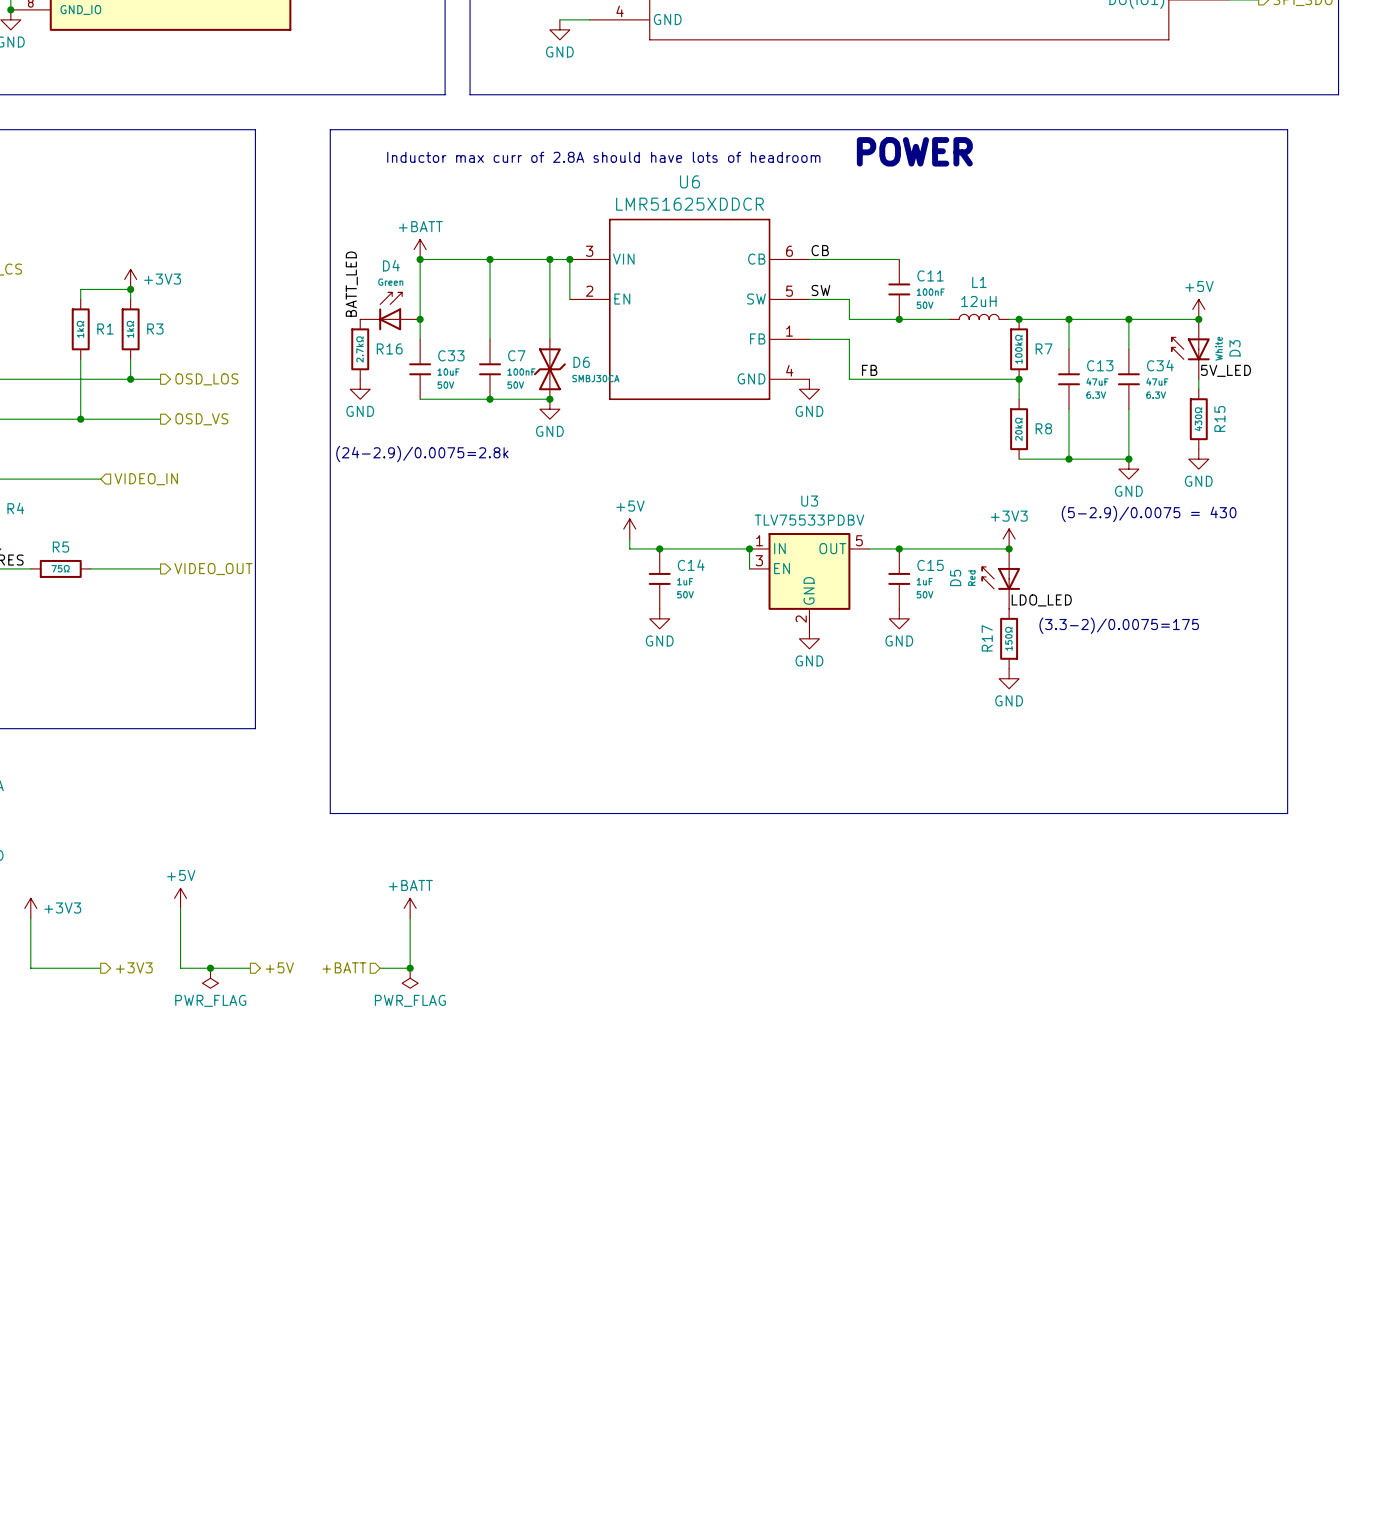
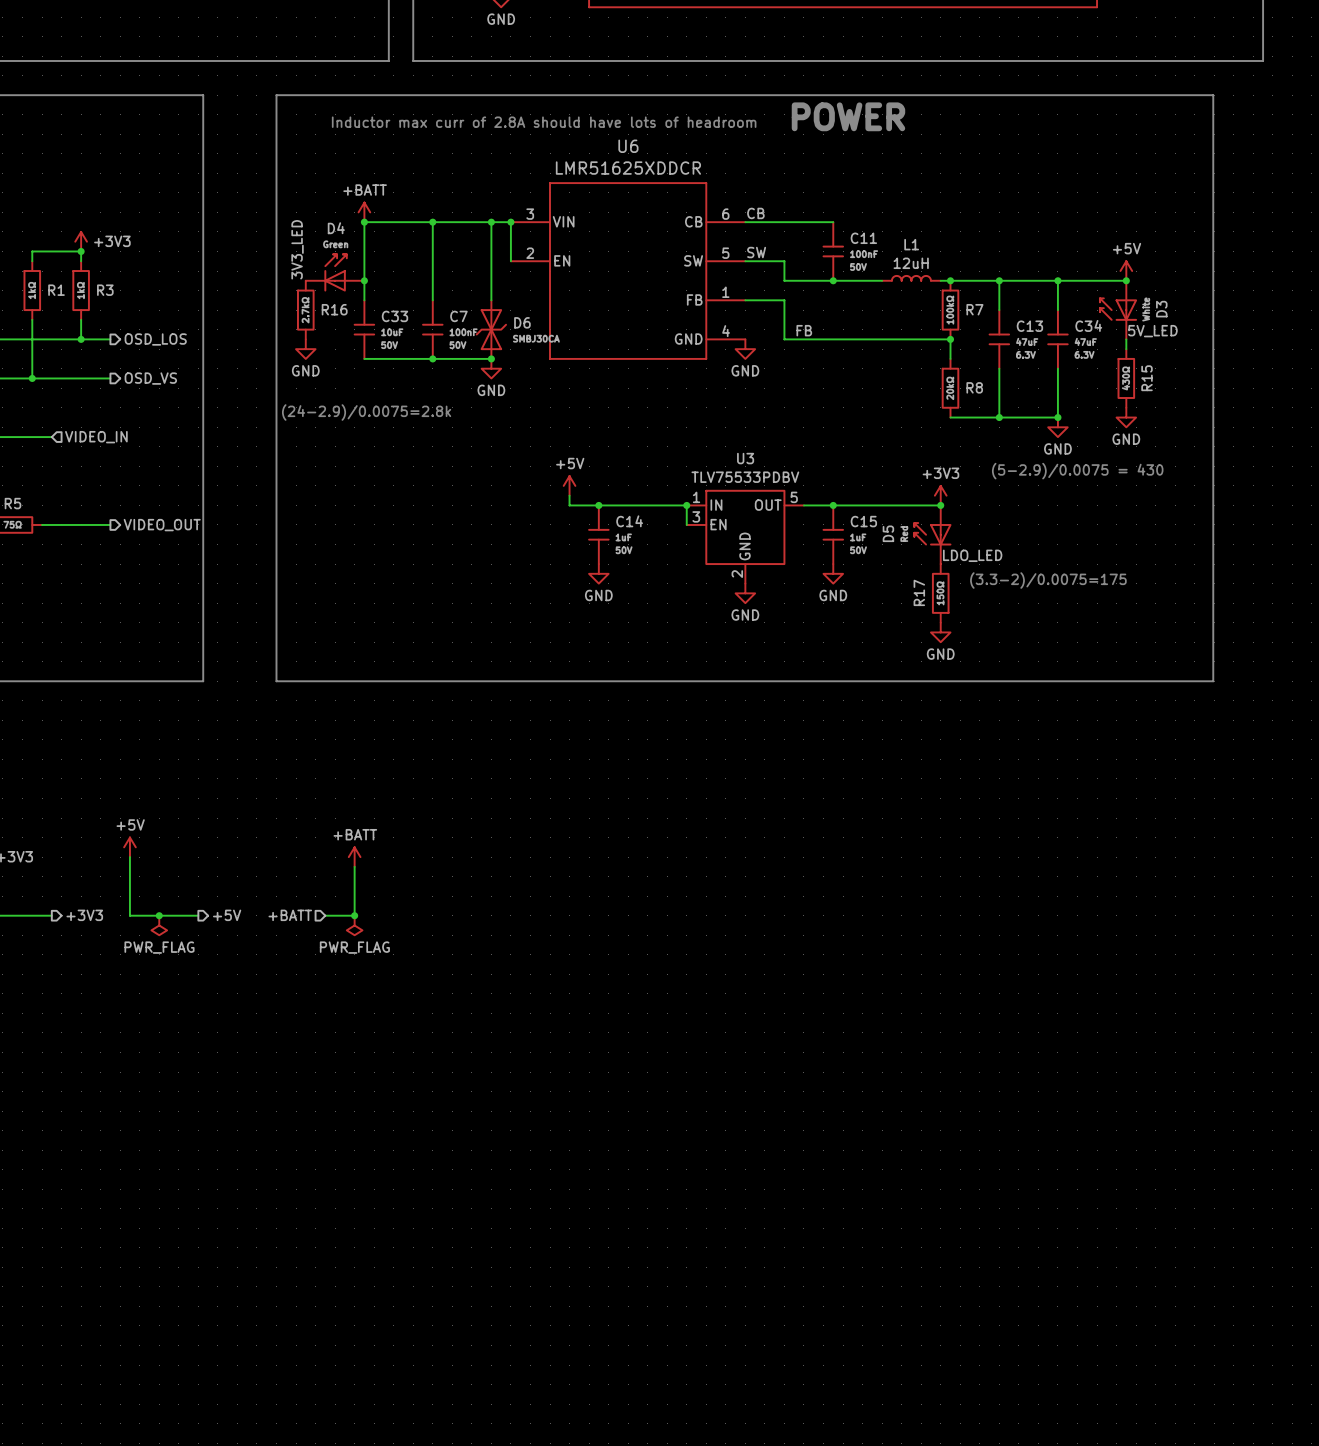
label: BATT_LED (351, 284) -> 3V3_LED (297, 249)
line: (330, 728) (330, 813) (1287, 813) (1287, 728) -> (276, 681) (1213, 681)

